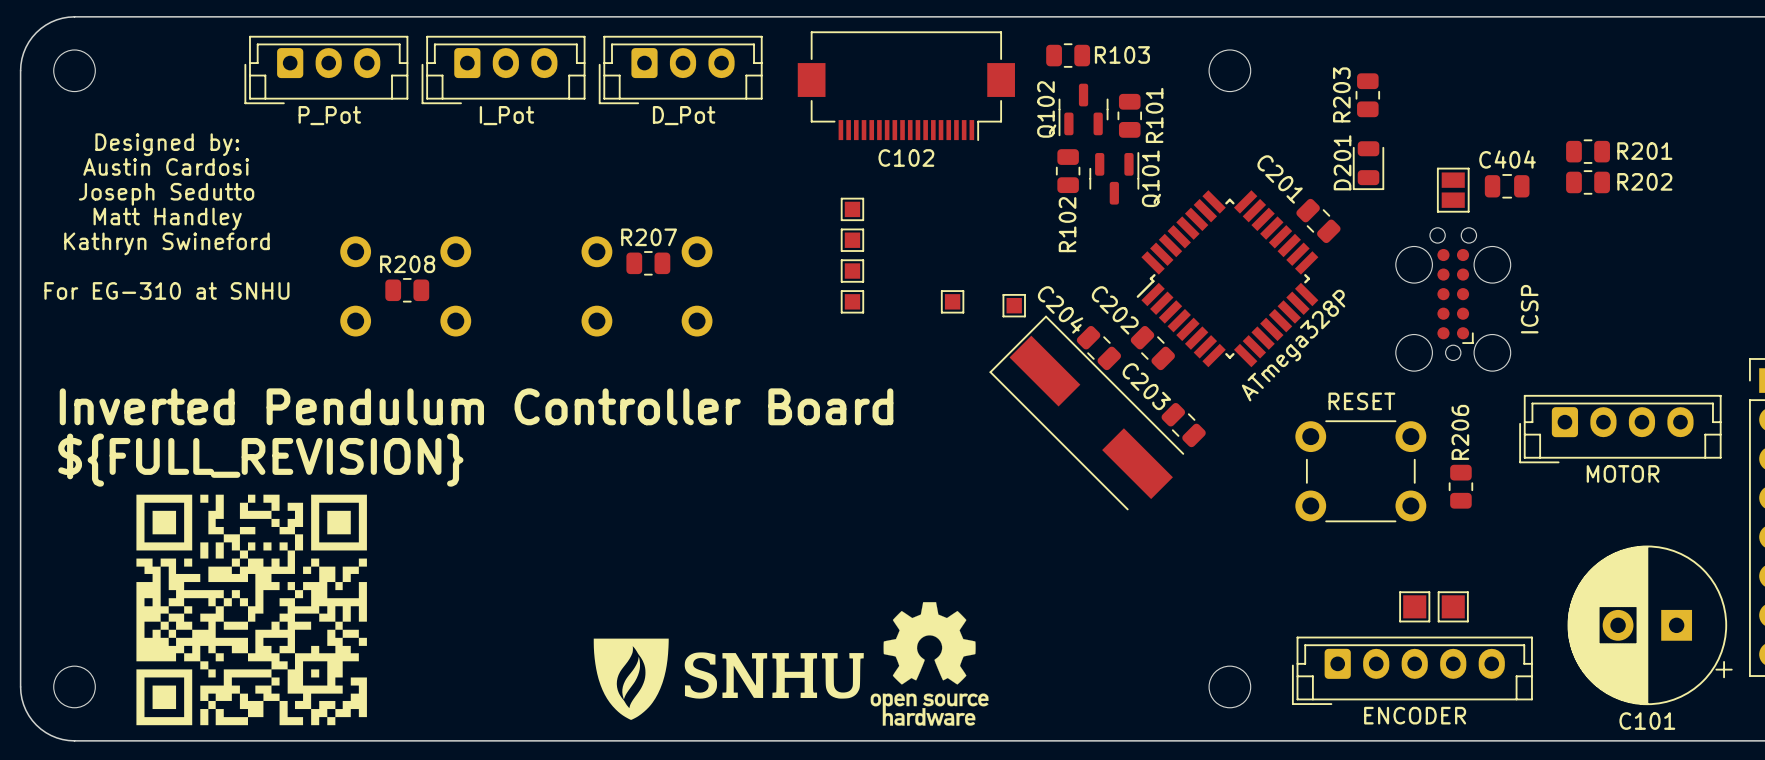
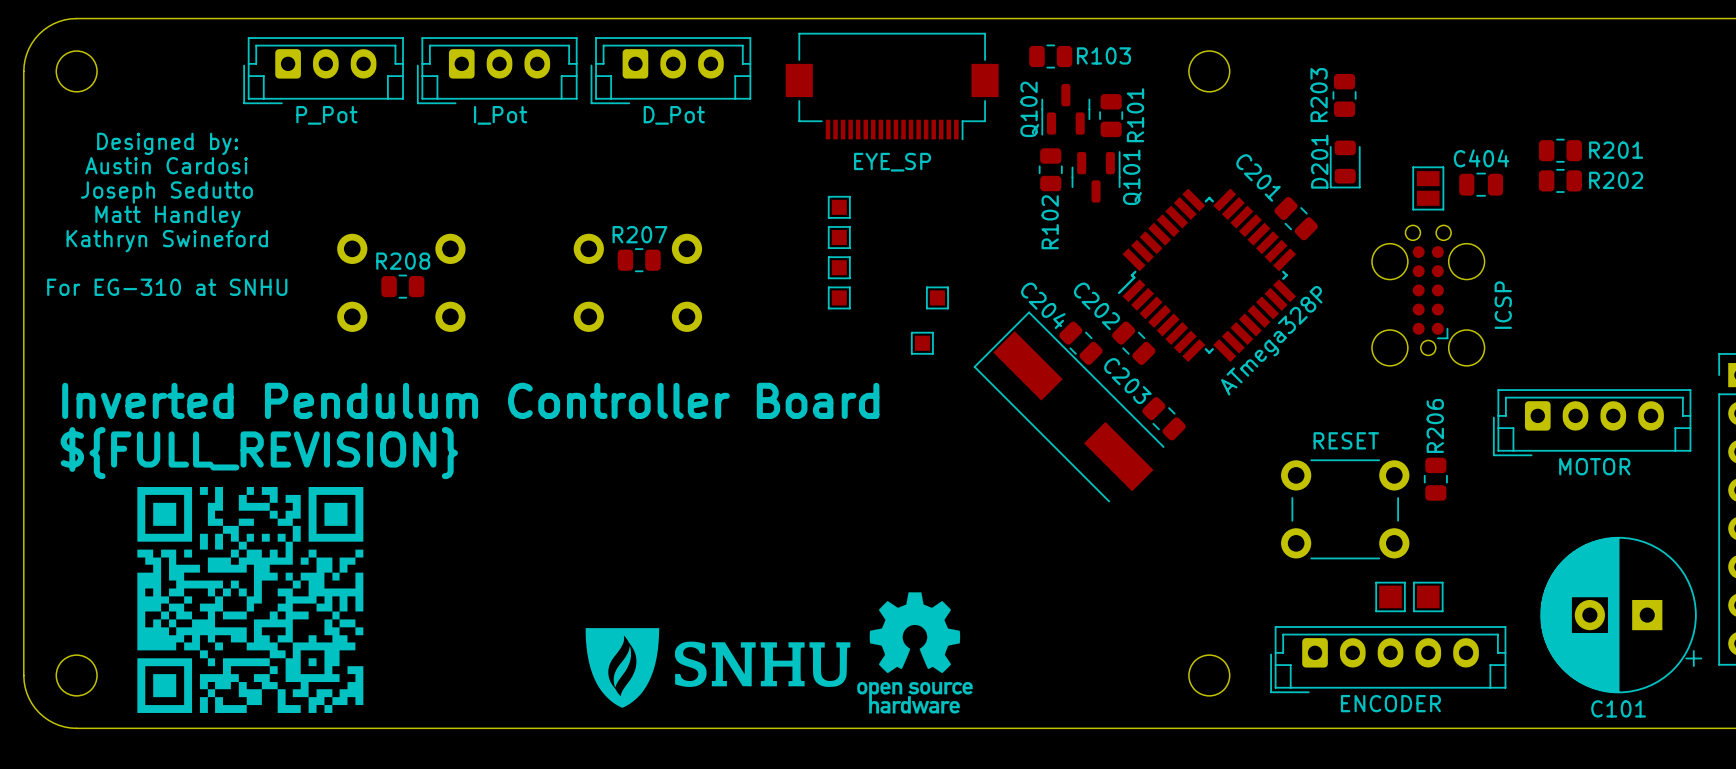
C102 name: C102 (906, 158) -> none
C102 value: none -> EYE_SP (892, 162)
part position: (1014, 305) -> (922, 343)
part position: (1360, 471) -> (1345, 509)

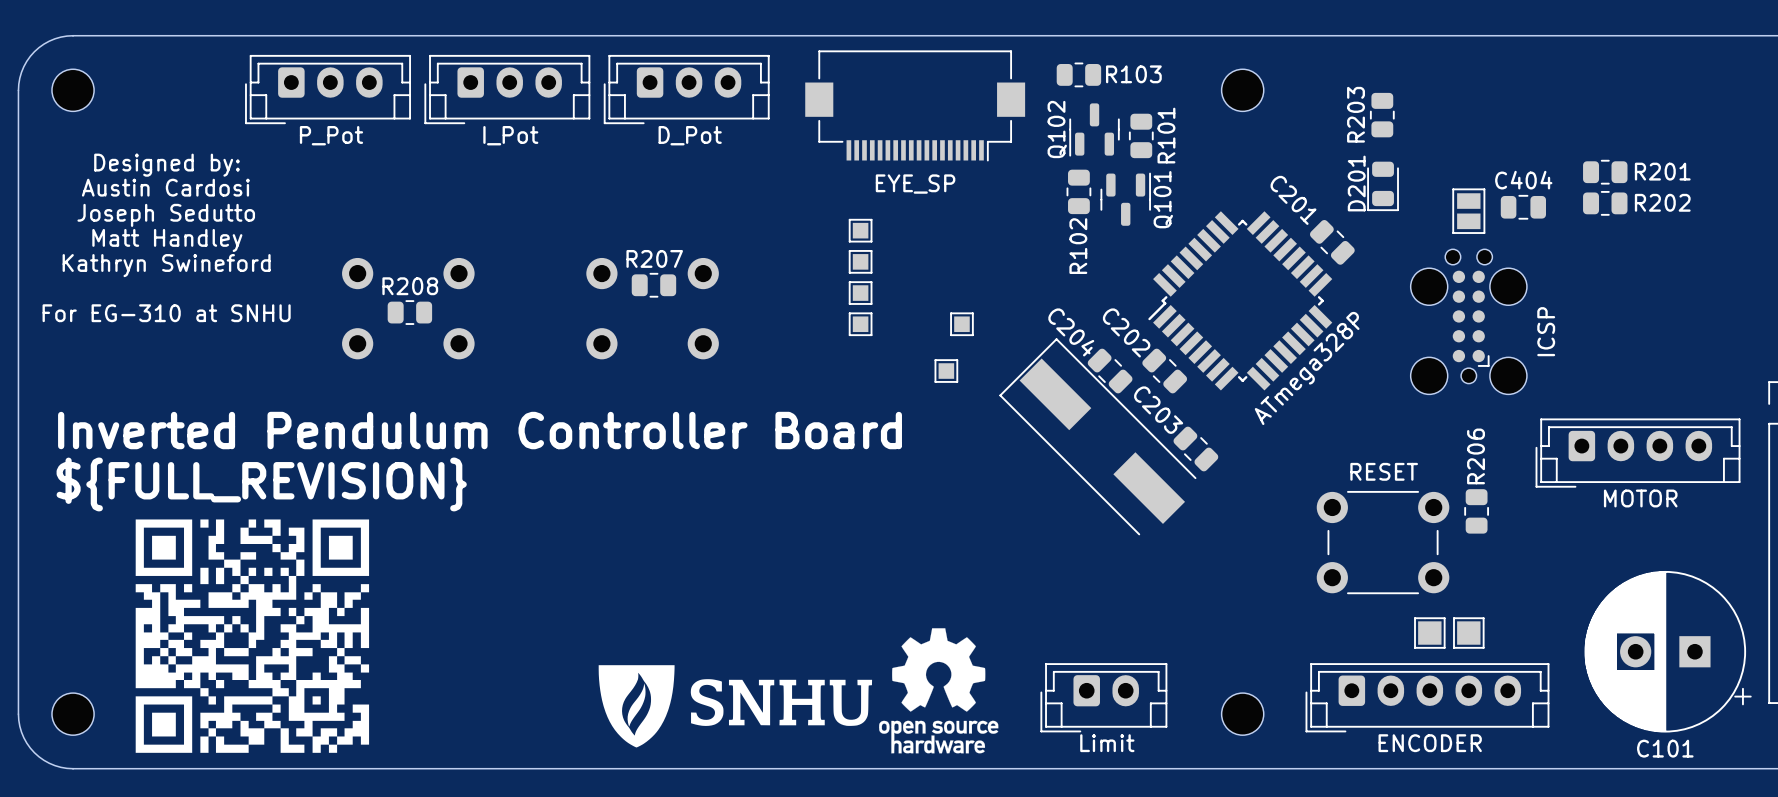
part: none -> Limit (1103, 697)

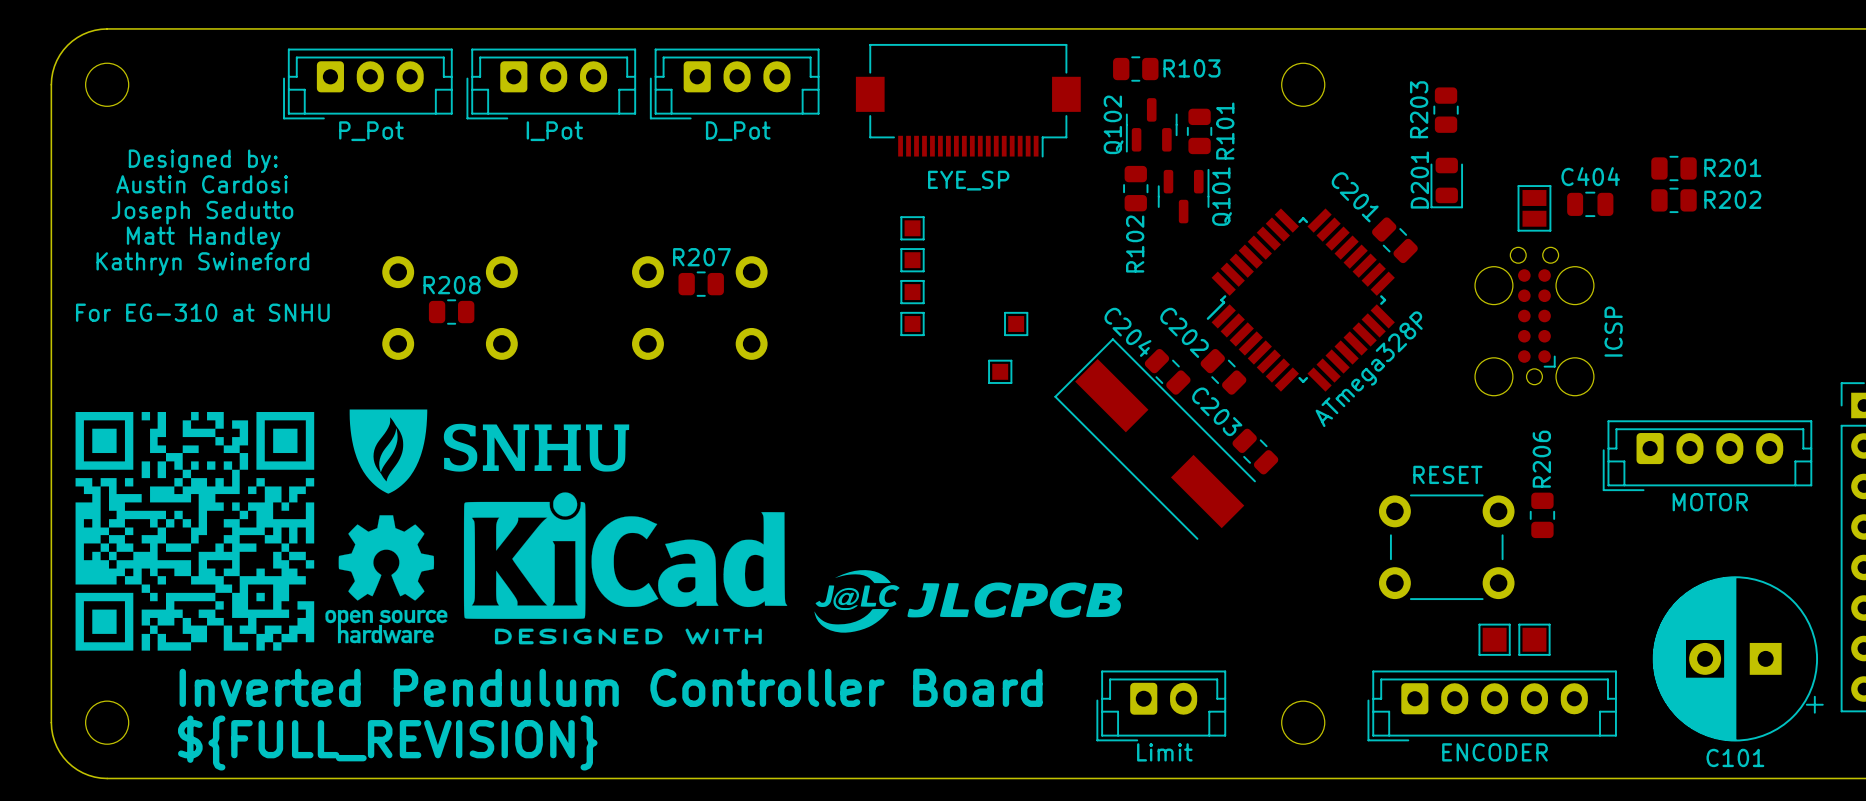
text position: Inverted Pendulum Controller Board (480, 430) -> Inverted Pendulum Controller Board (611, 687)
text position: ${FULL_REVISION} (261, 484) -> ${FULL_REVISION} (387, 742)
drawing: none -> [325, 492, 788, 645]
drawing: none -> [814, 570, 1123, 633]
drawing: [879, 628, 999, 754] -> none
drawing position: (252, 636) -> (194, 531)
drawing position: (735, 706) -> (489, 451)

